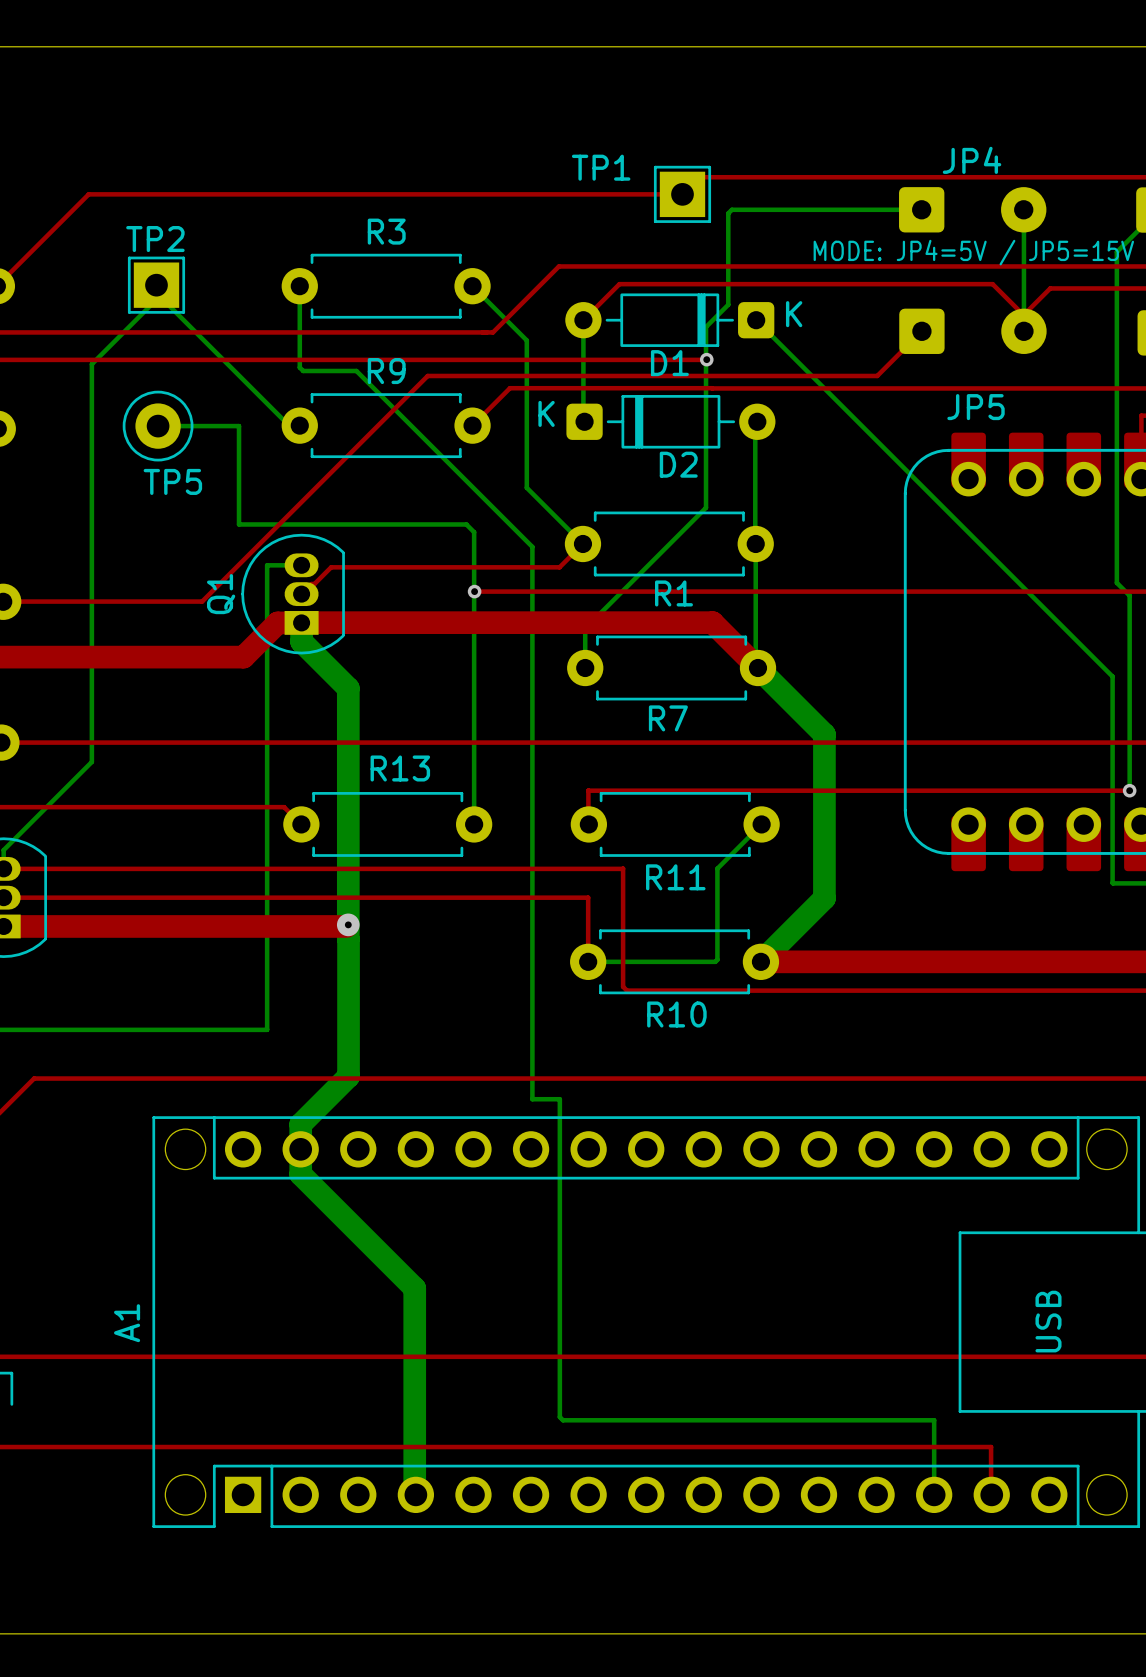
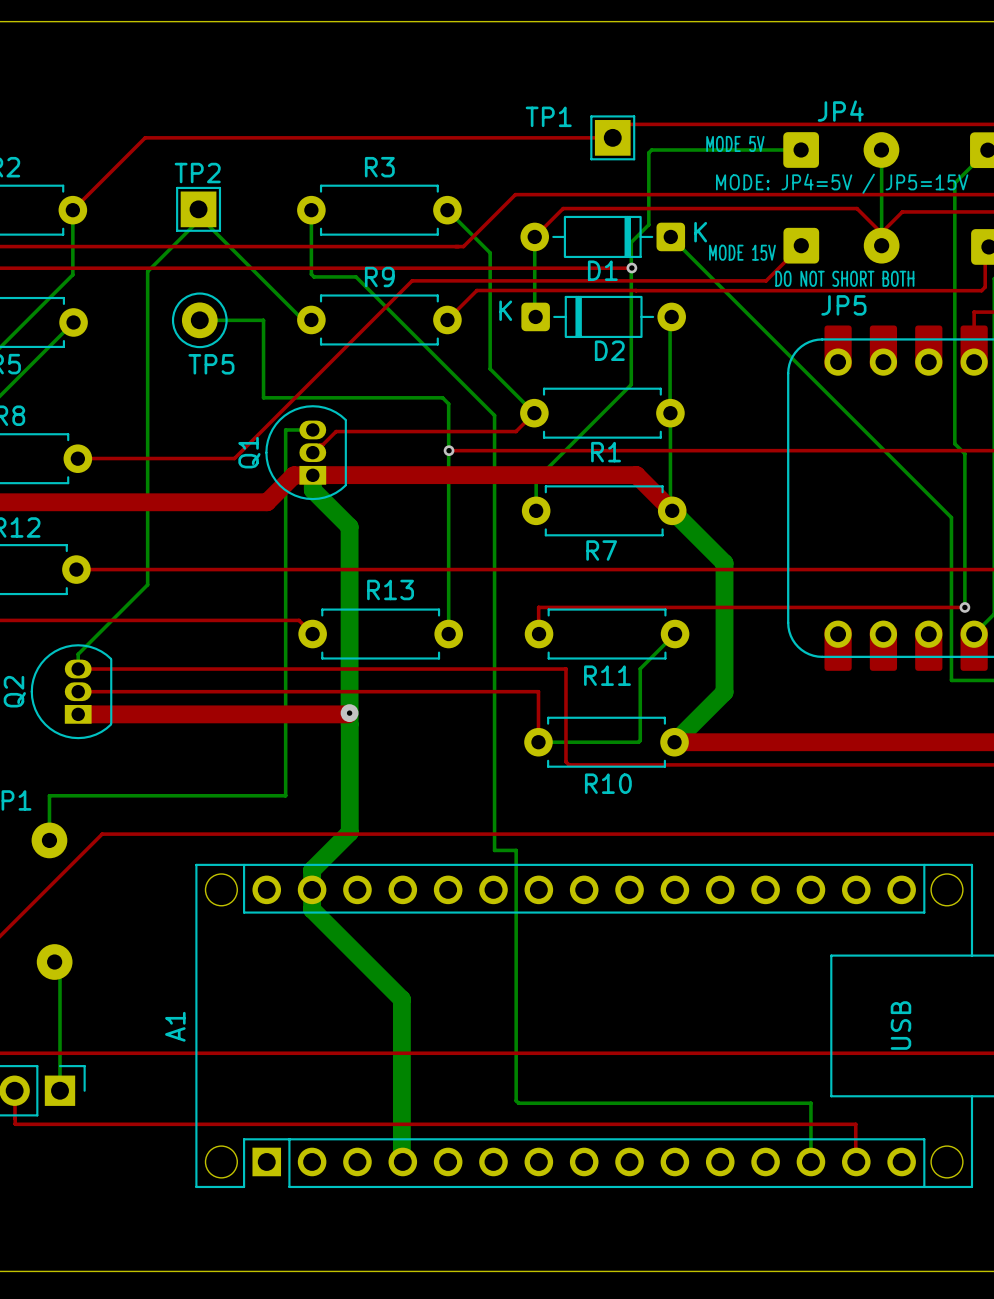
text: none -> MODE 5V (735, 143)
text: none -> MODE 15V (742, 252)
text: none -> DO NOT SHORT BOTH (844, 278)

